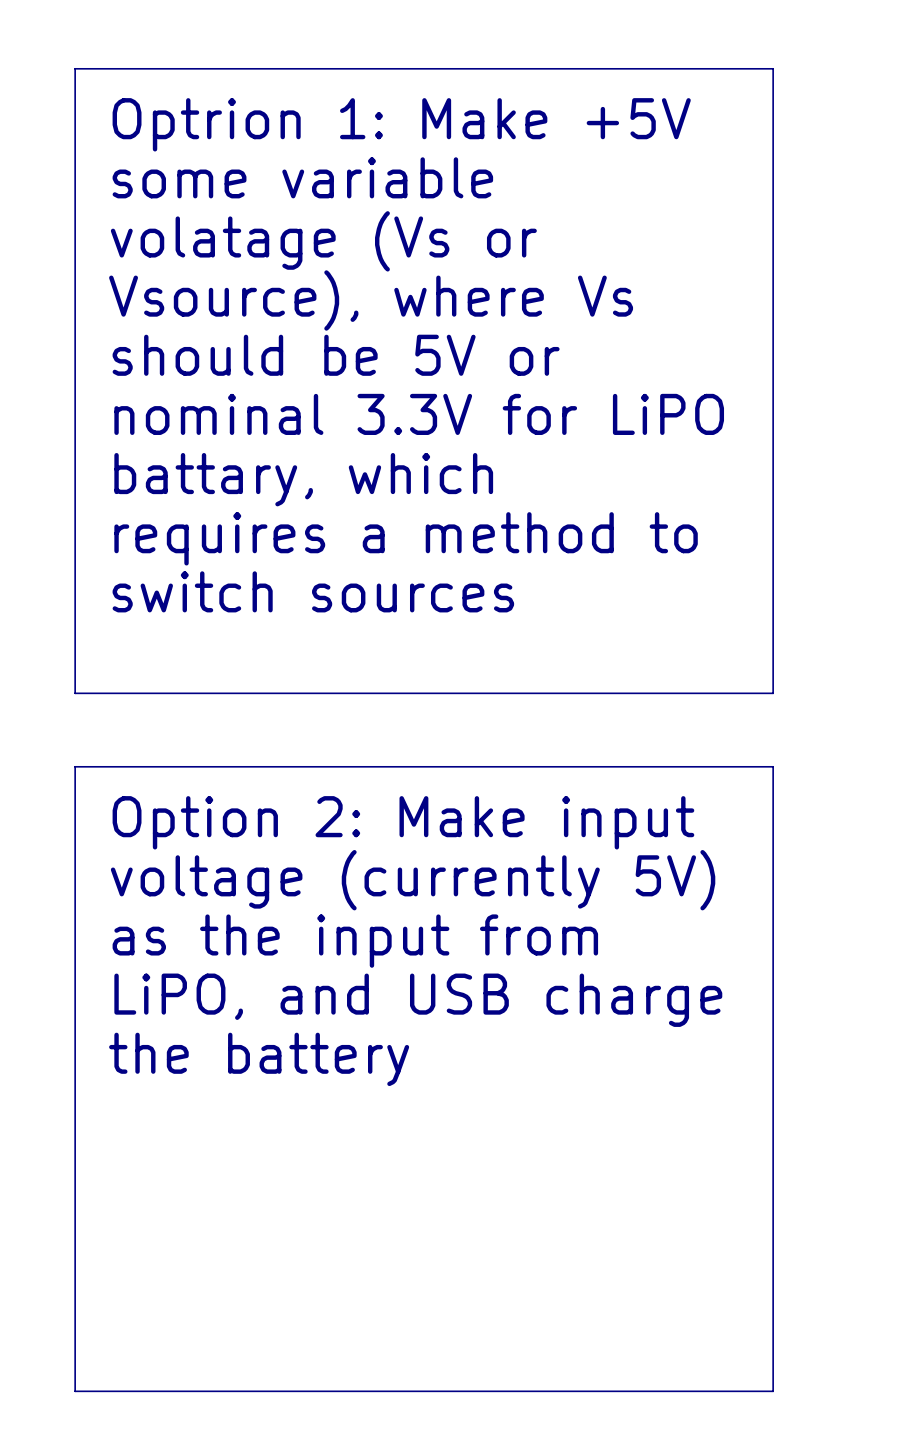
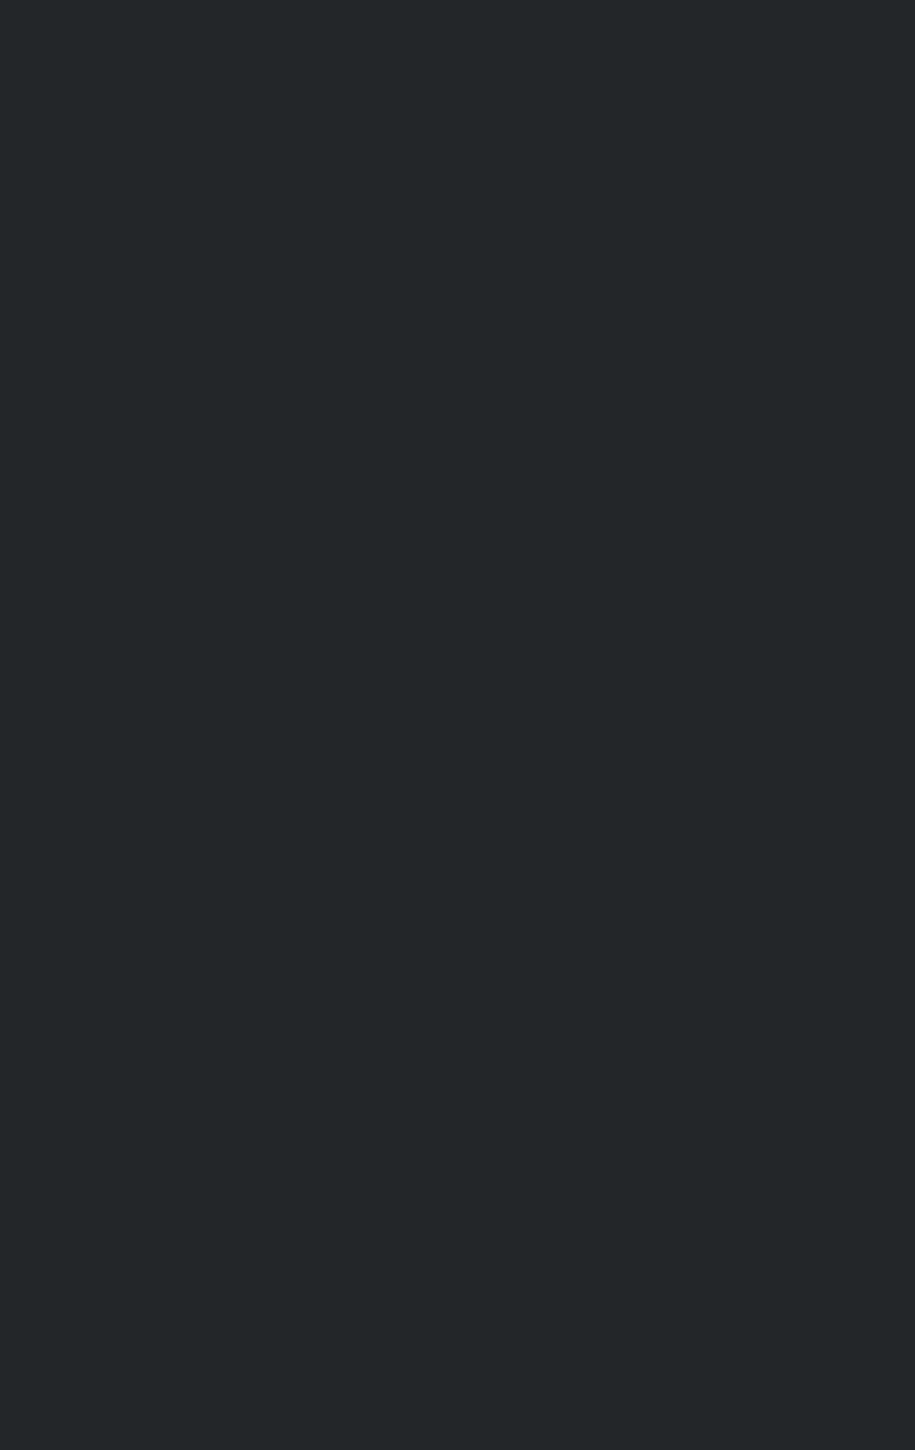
line: (75, 68) (75, 693) (773, 693) (773, 68) (75, 68) -> none
text: Optrion 1: Make +5V (401, 124) -> none
text: some variable (302, 177) -> none
text: volatage (Vs or (323, 241) -> none
text: Vsource), where Vs (371, 300) -> none
text: should be 5V or (336, 355) -> none
text: nominal 3.3V for LiPO (419, 414) -> none
text: battary, which (303, 479) -> none
text: requires a method to (406, 538) -> none
text: switch sources (313, 591) -> none
line: (75, 766) (773, 766) (773, 1391) (75, 1391) (75, 766) -> none
text: Option 2: Make input (403, 822) -> none
text: voltage (currently 5V) (413, 880) -> none
text: as the input from (355, 941) -> none
text: LiPO, and USB charge (418, 1000) -> none
text: the battery (259, 1059) -> none

